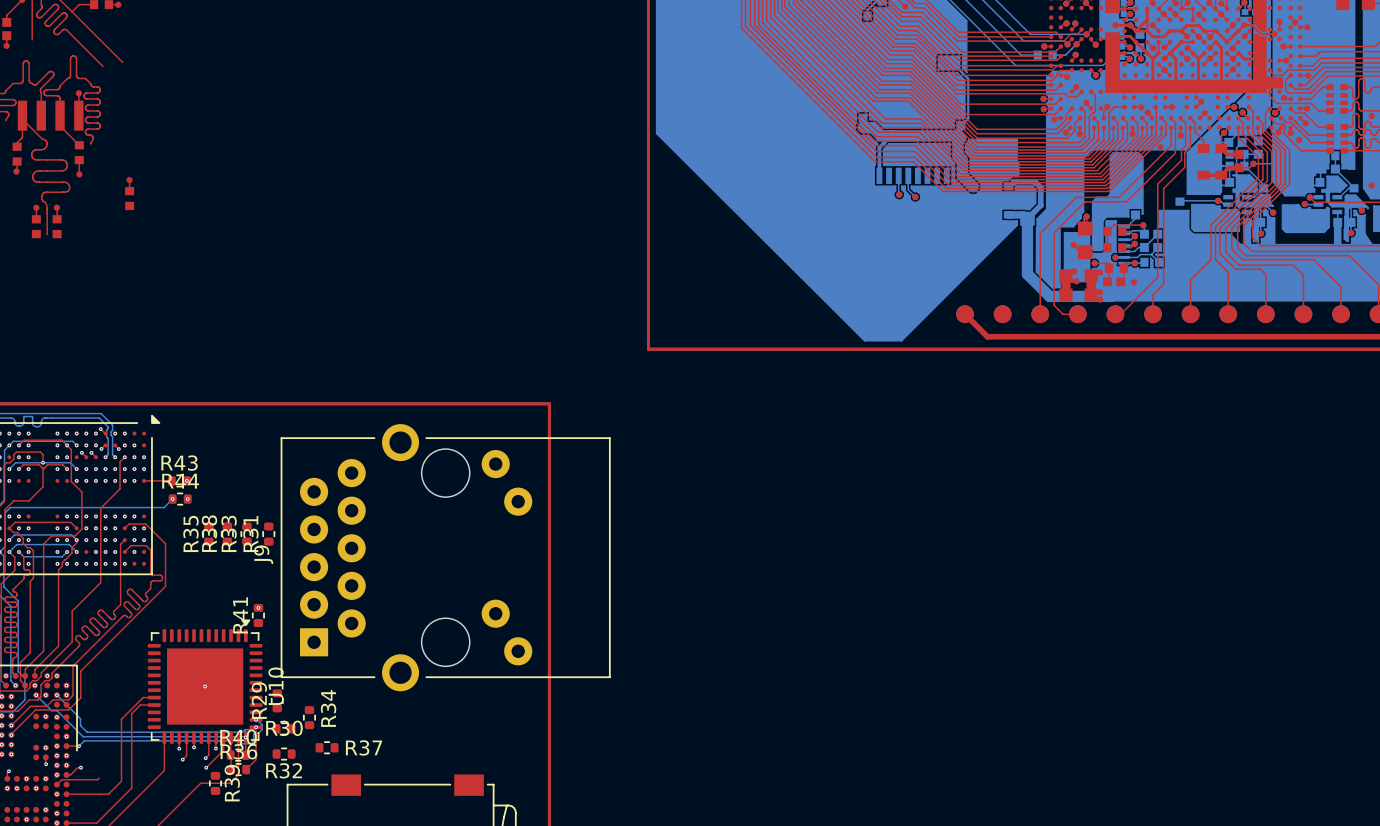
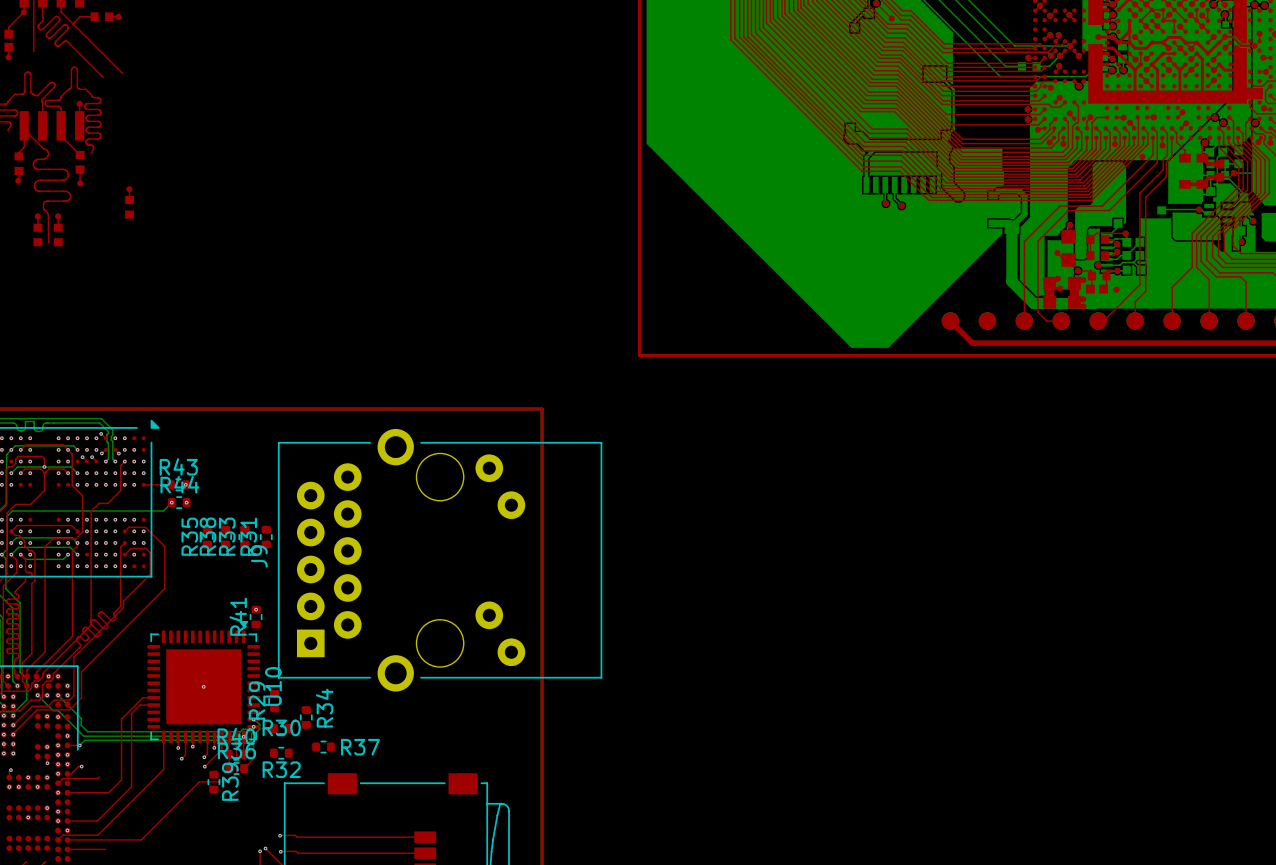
top track: (120, 461) (120, 488) (100, 508) (100, 582) (72, 611) (72, 641) -> (120, 465) (120, 490) (107, 503) (98, 503) (91, 511) (91, 625) (73, 643)
top track: (72, 547) (72, 553) (65, 559) -> none
top track: (65, 559) (58, 570) (58, 645) (34, 671) -> (72, 550) (72, 636) (36, 672)
top track: (150, 571) (152, 575) (161, 575) (162, 578) (151, 581) (150, 588) (145, 594) (147, 600) (143, 601) (131, 589) (128, 589) (127, 593) (139, 605) (139, 608) (135, 609) (128, 602) (125, 602) (124, 605) (131, 613) (131, 615) (128, 617) (123, 615) (73, 666) -> (150, 574) (123, 600) (123, 607) (73, 657) (73, 666)

